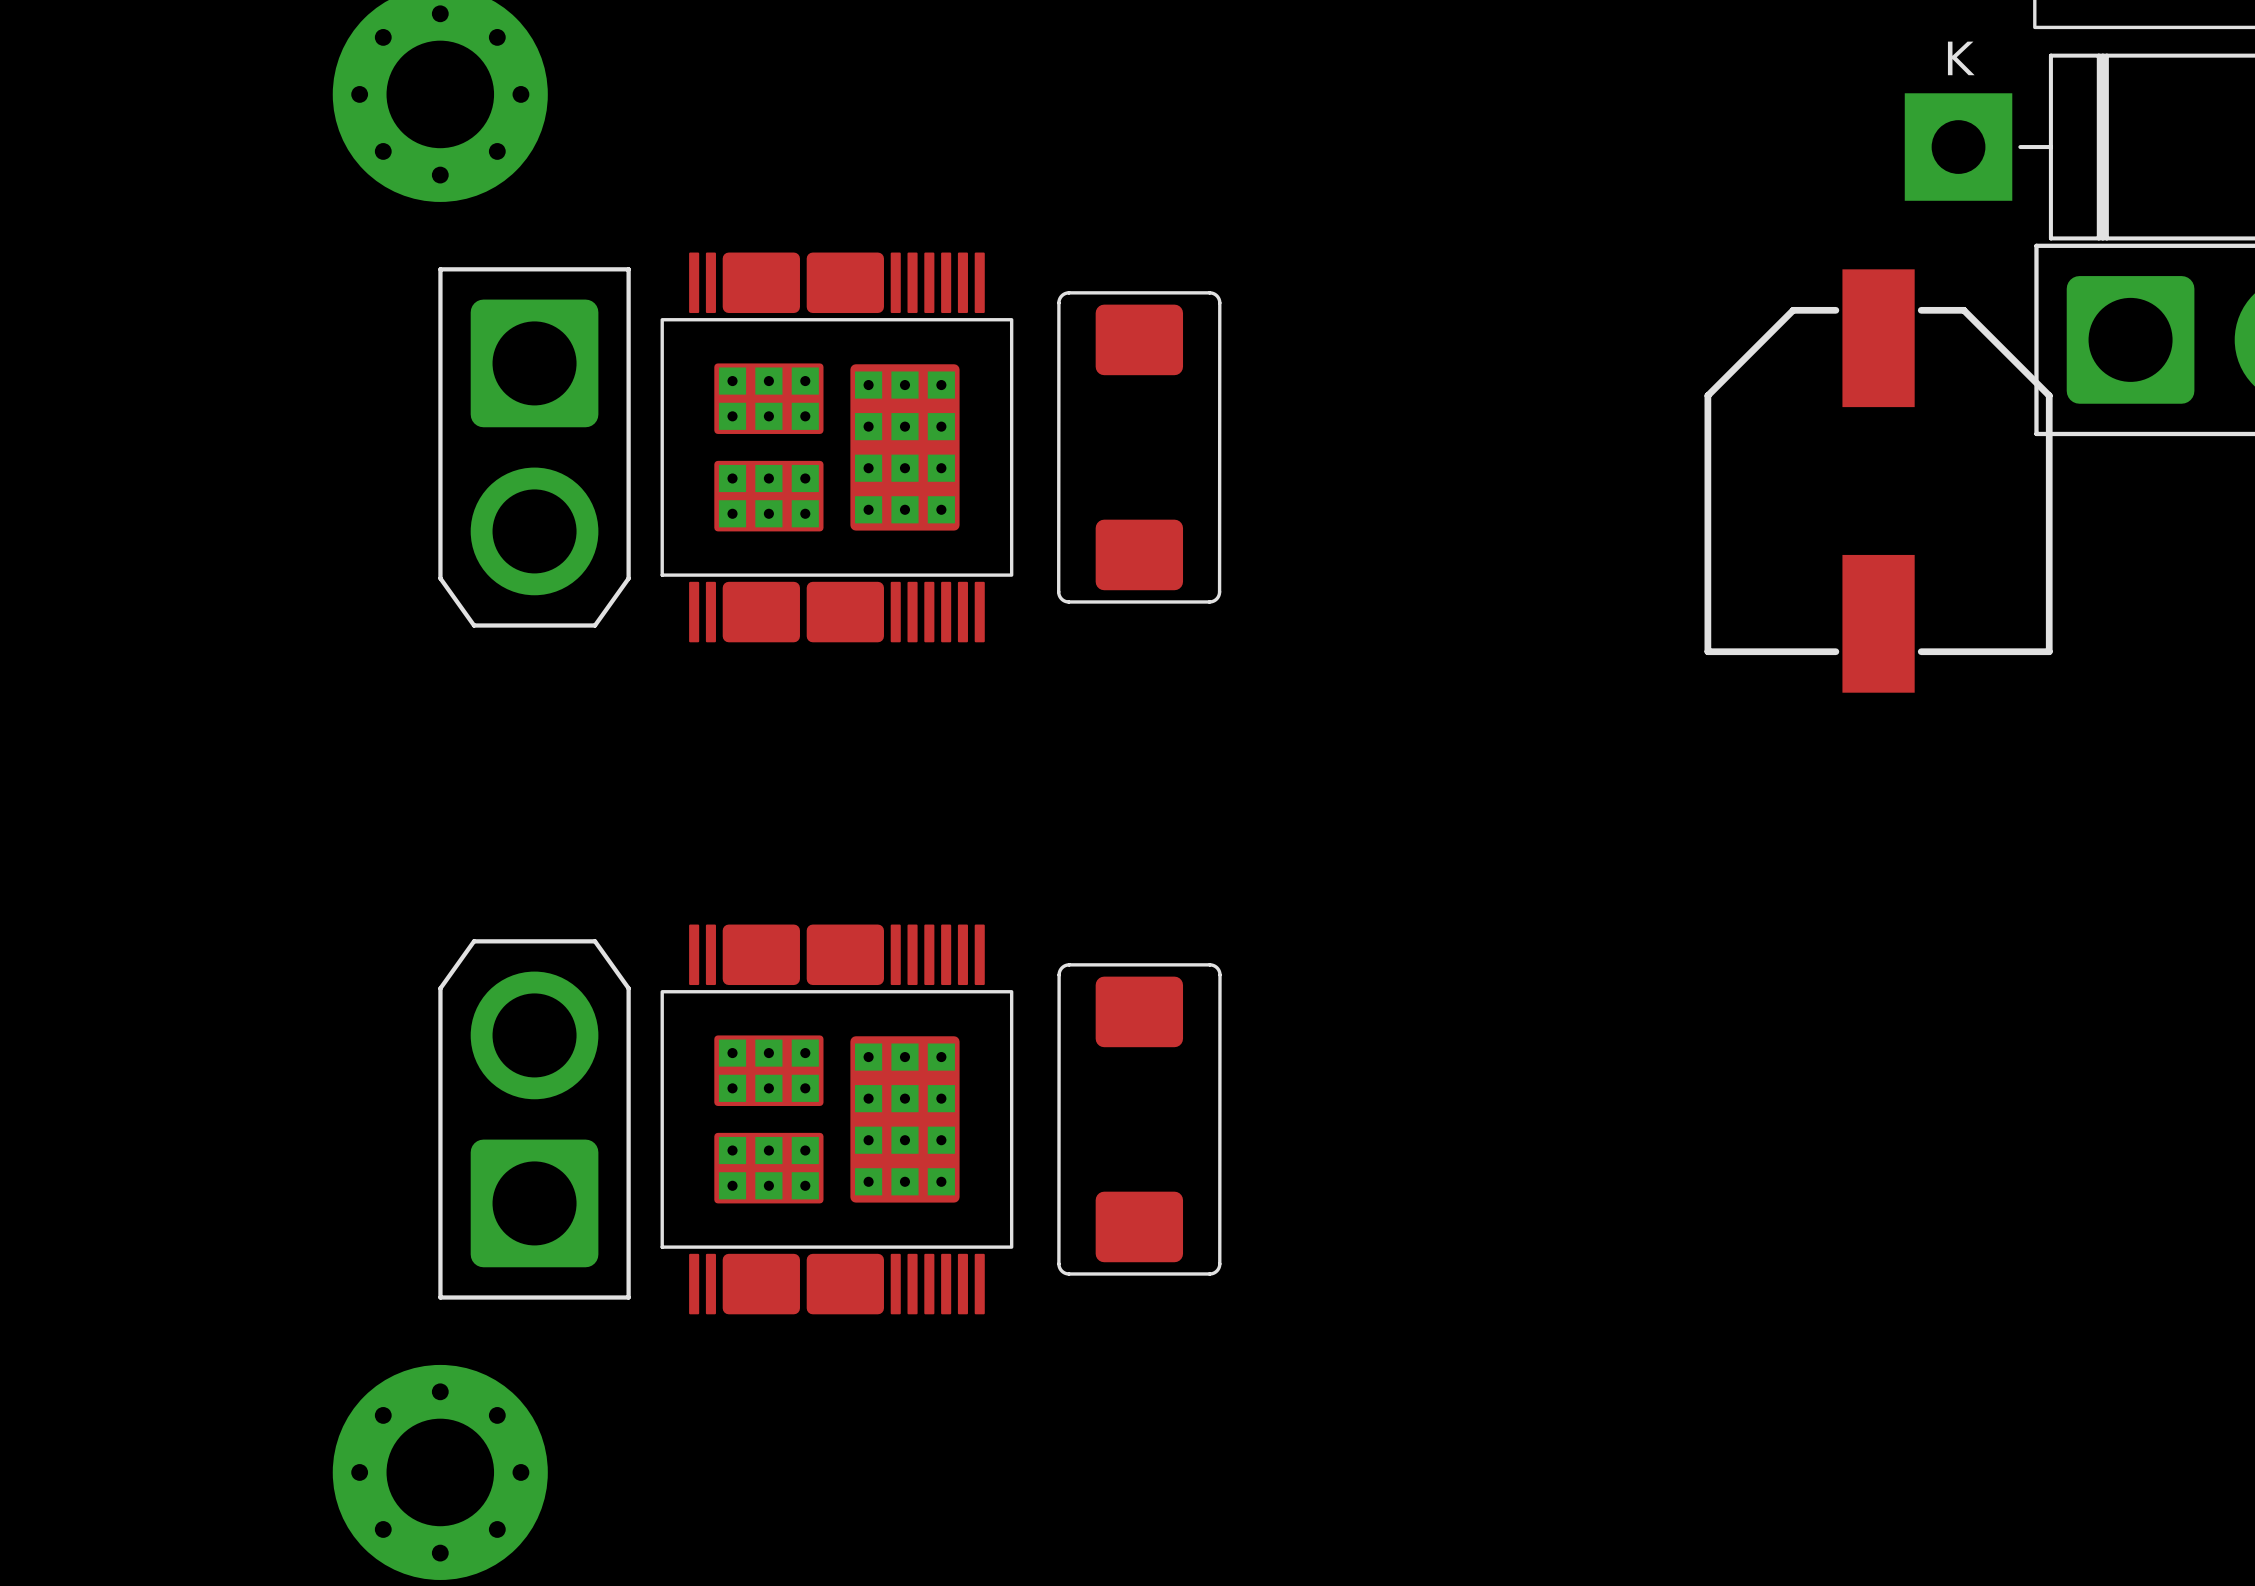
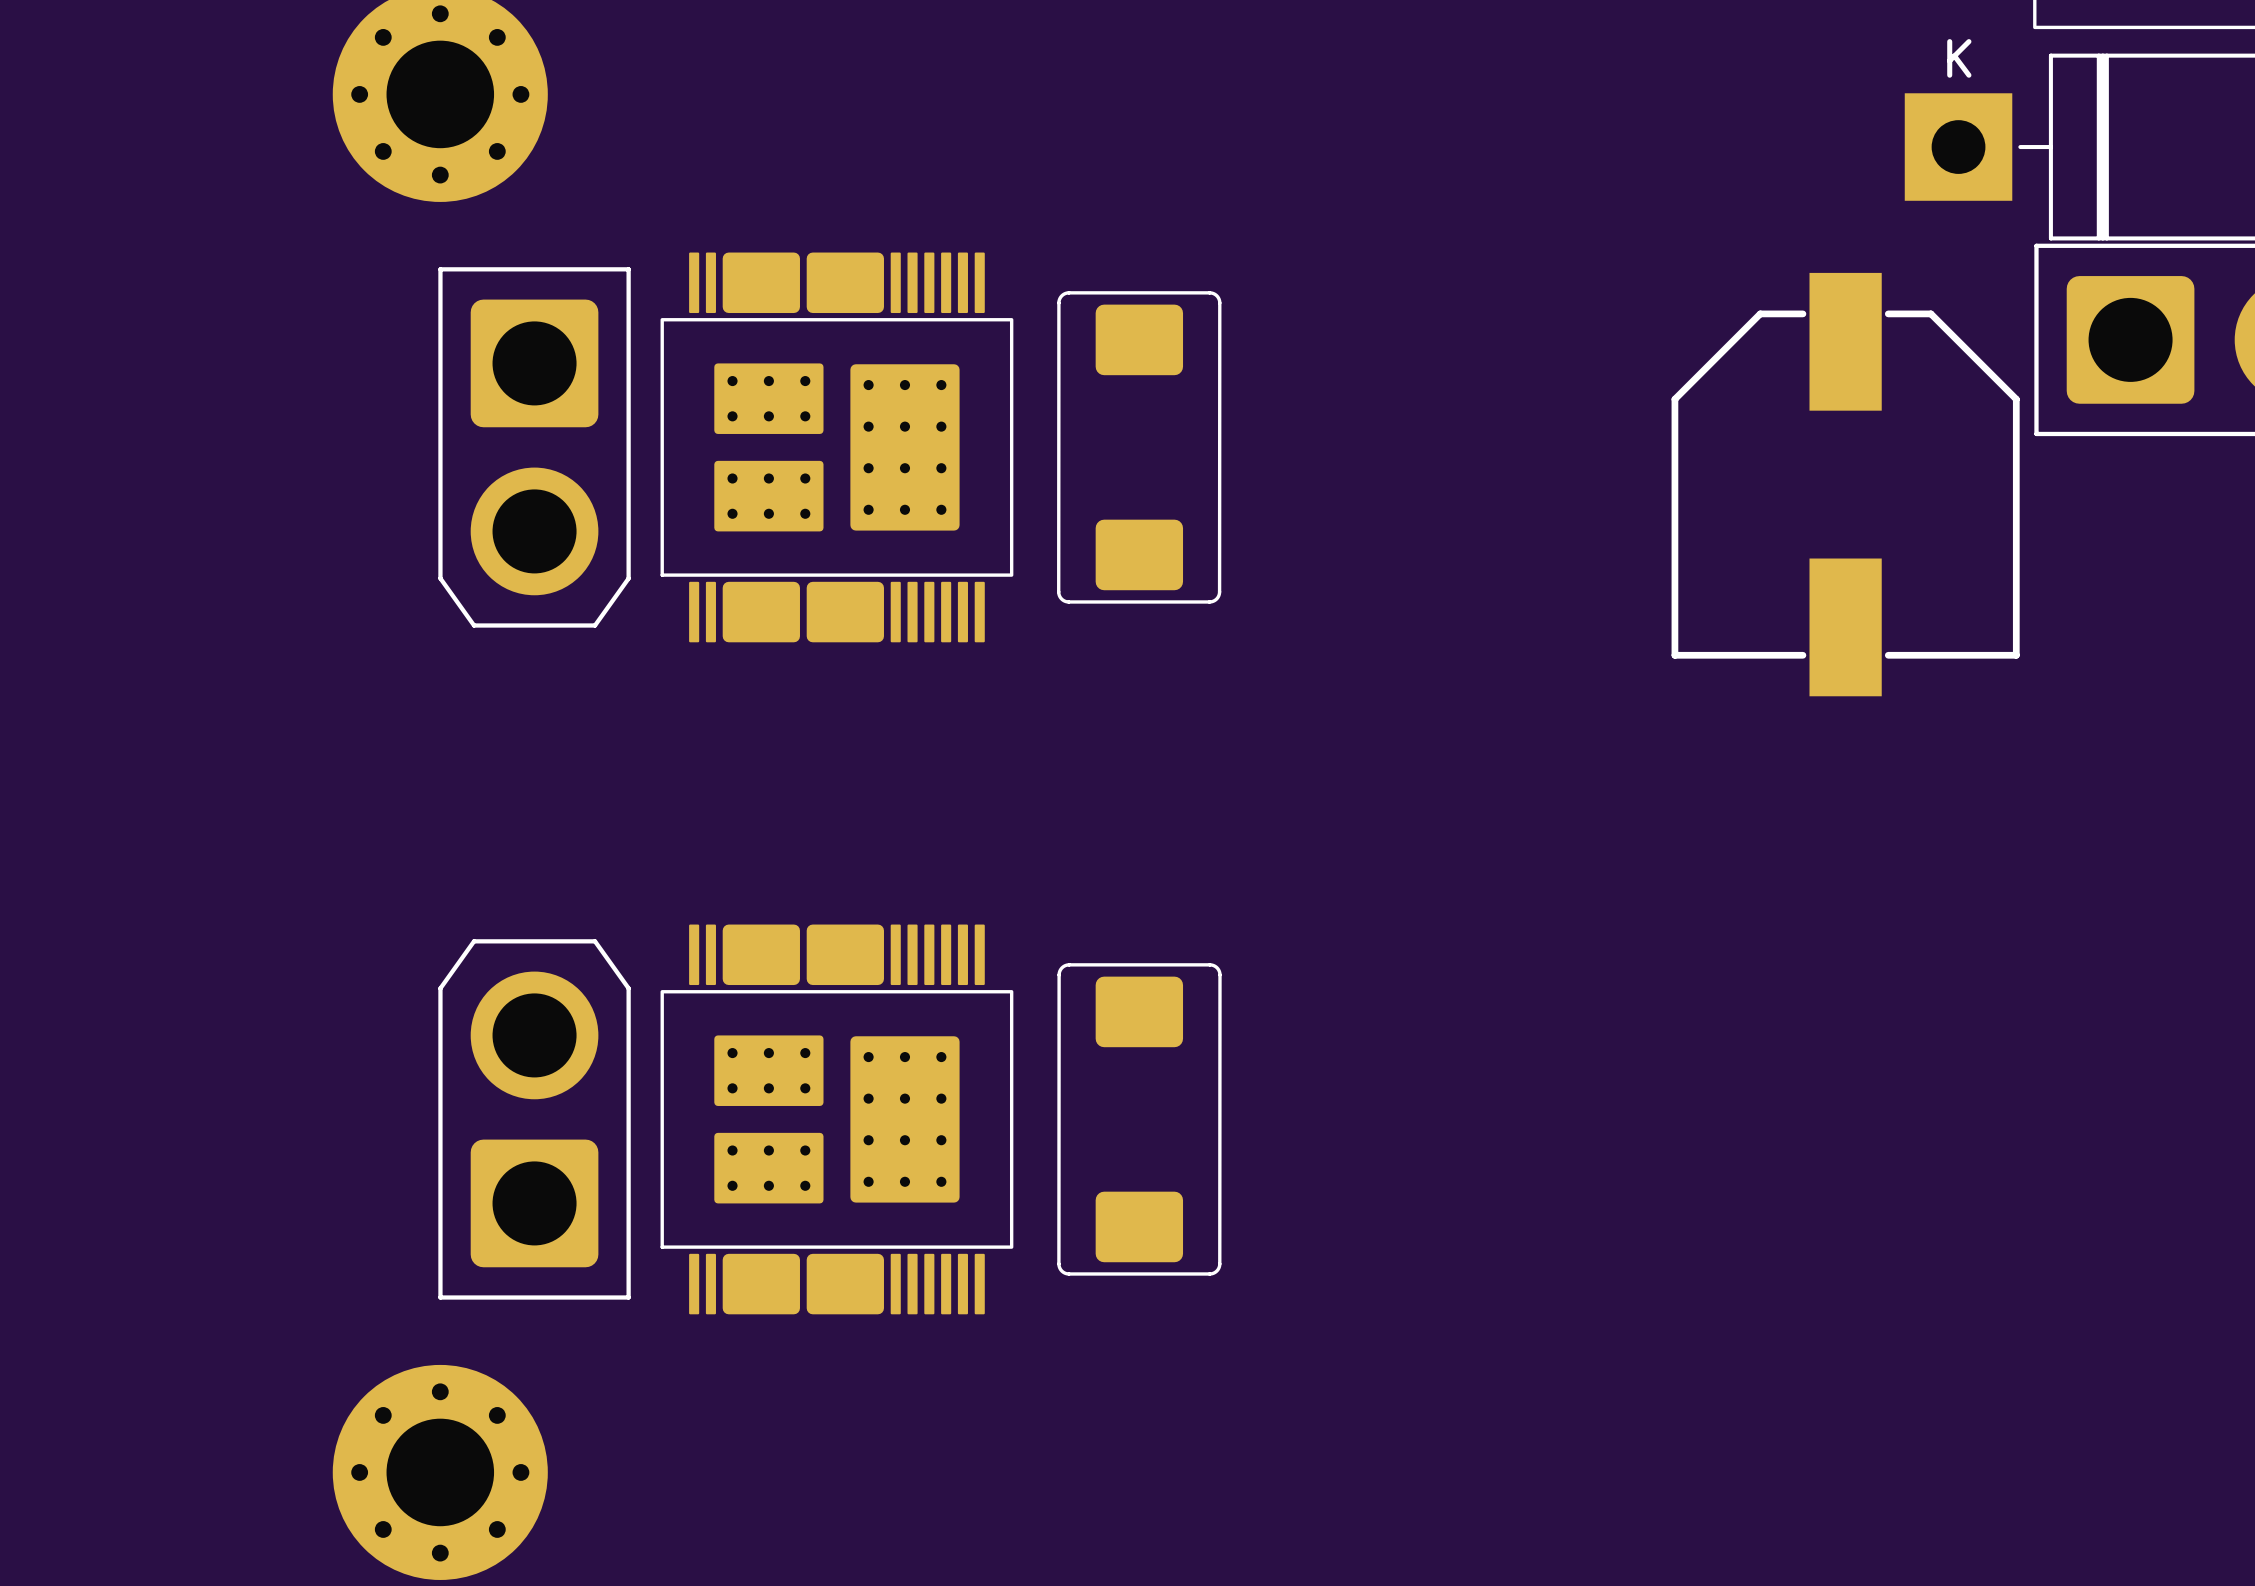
part position: (1878, 481) -> (1845, 484)

